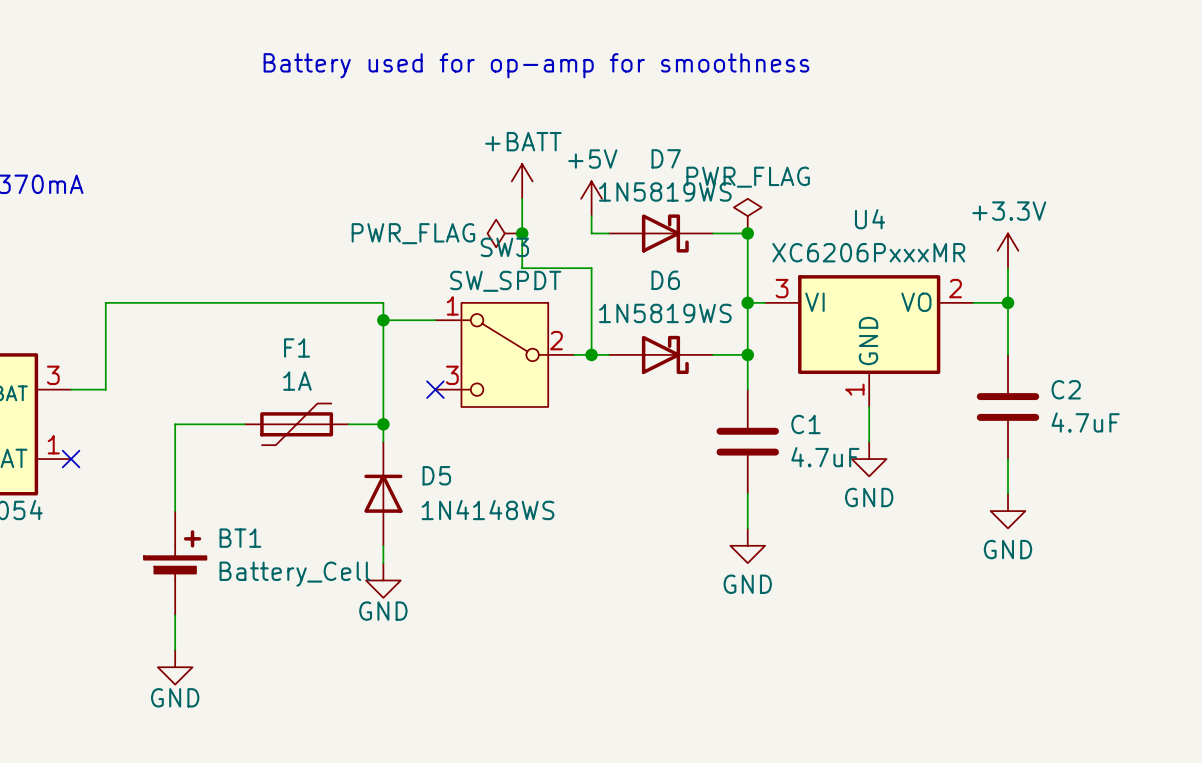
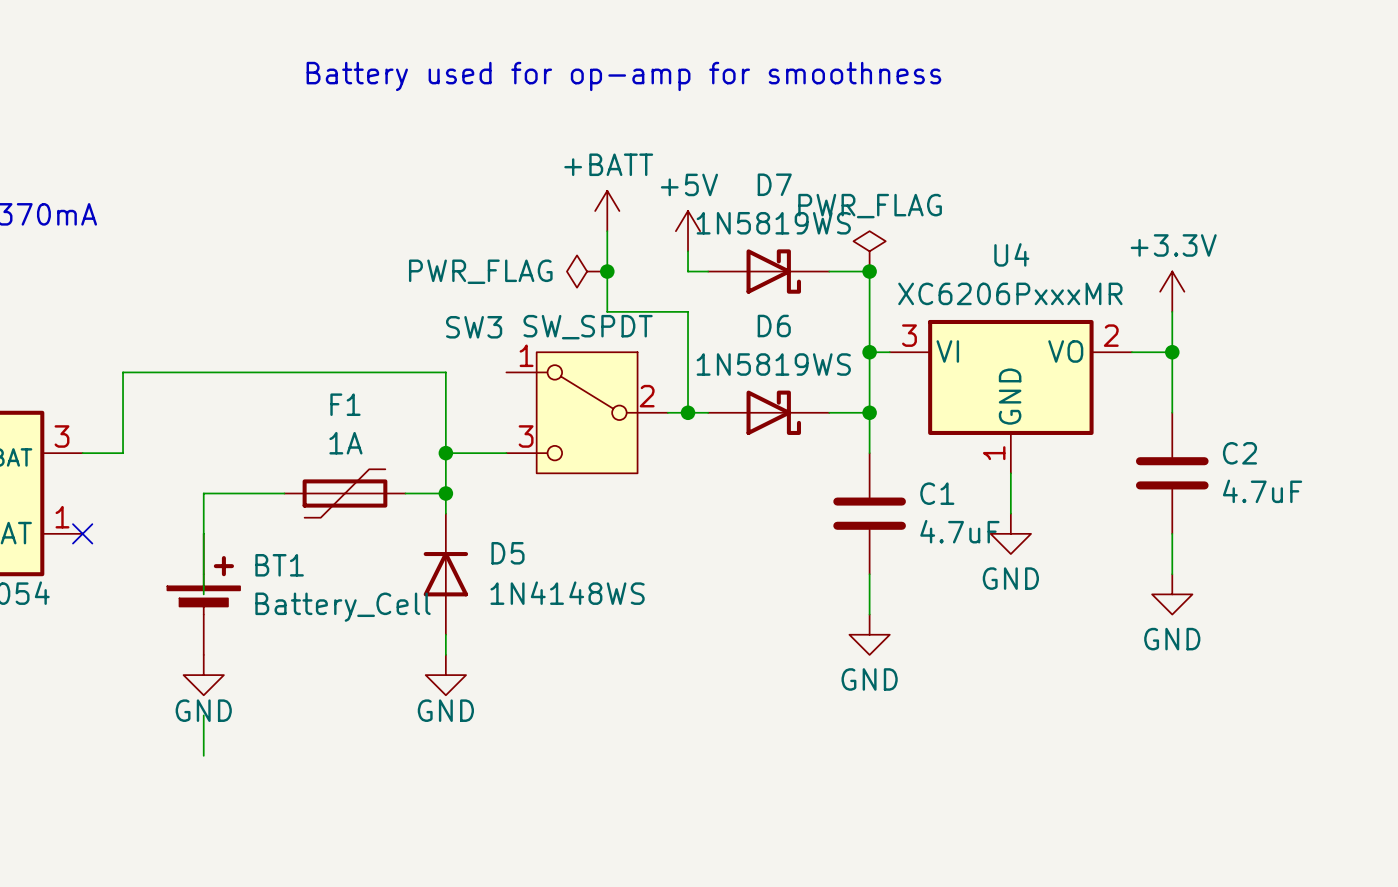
SW3 name position: SW3 (504, 247) -> SW3 (474, 327)
wire: (105, 320) (105, 302) (383, 302) (383, 320) (435, 320) -> (123, 372) (445, 372)
junction position: (383, 320) -> (445, 453)
wire: none -> (445, 453) (506, 453)
no-connect mark: (435, 389) -> none
BT1 position: (175, 563) -> (203, 594)
power symbol position: GND (175, 667) -> GND (203, 675)

